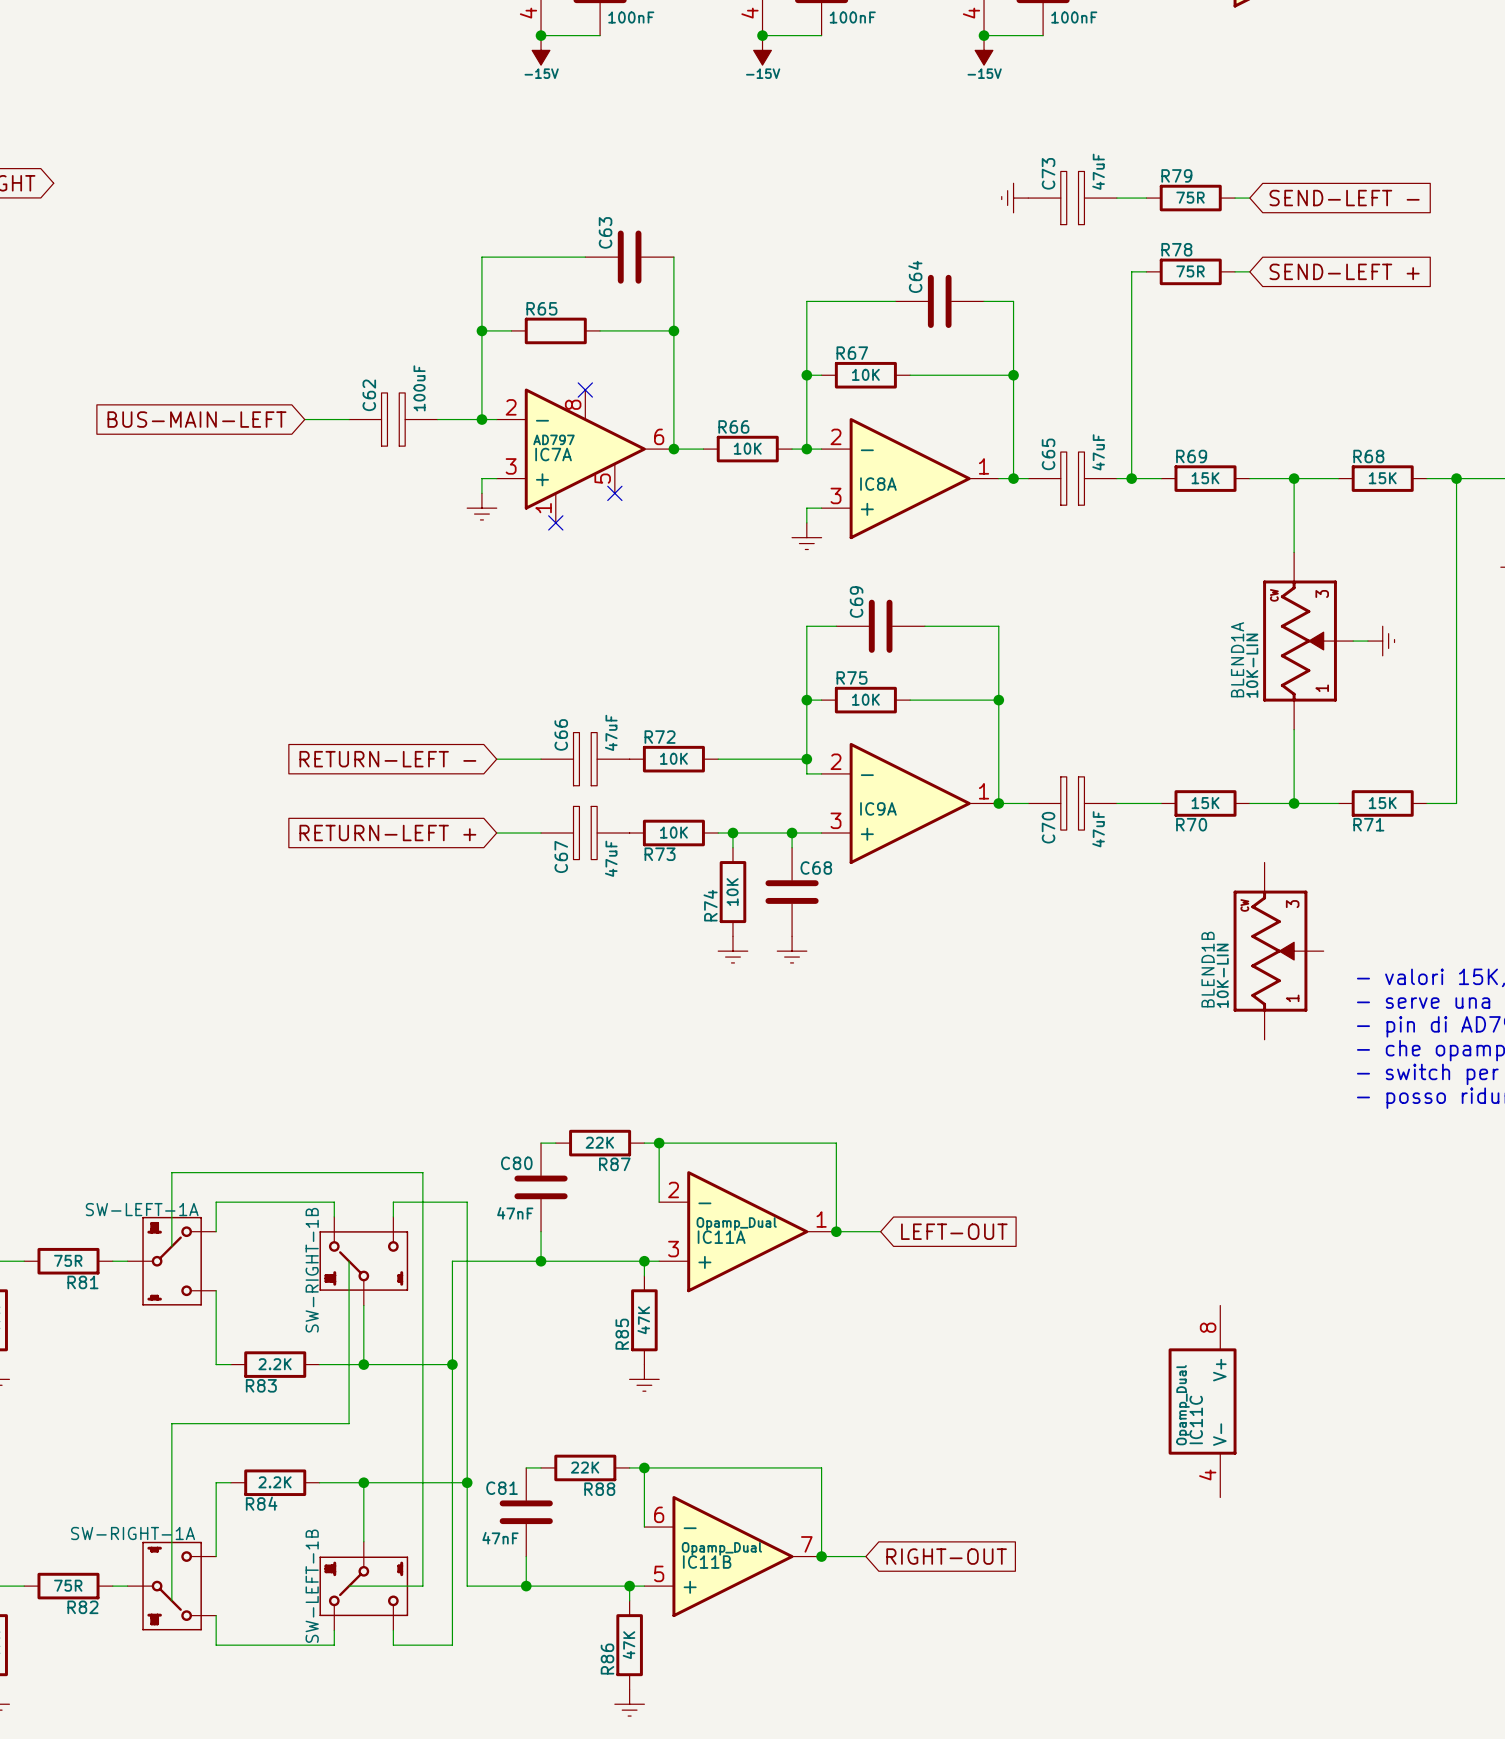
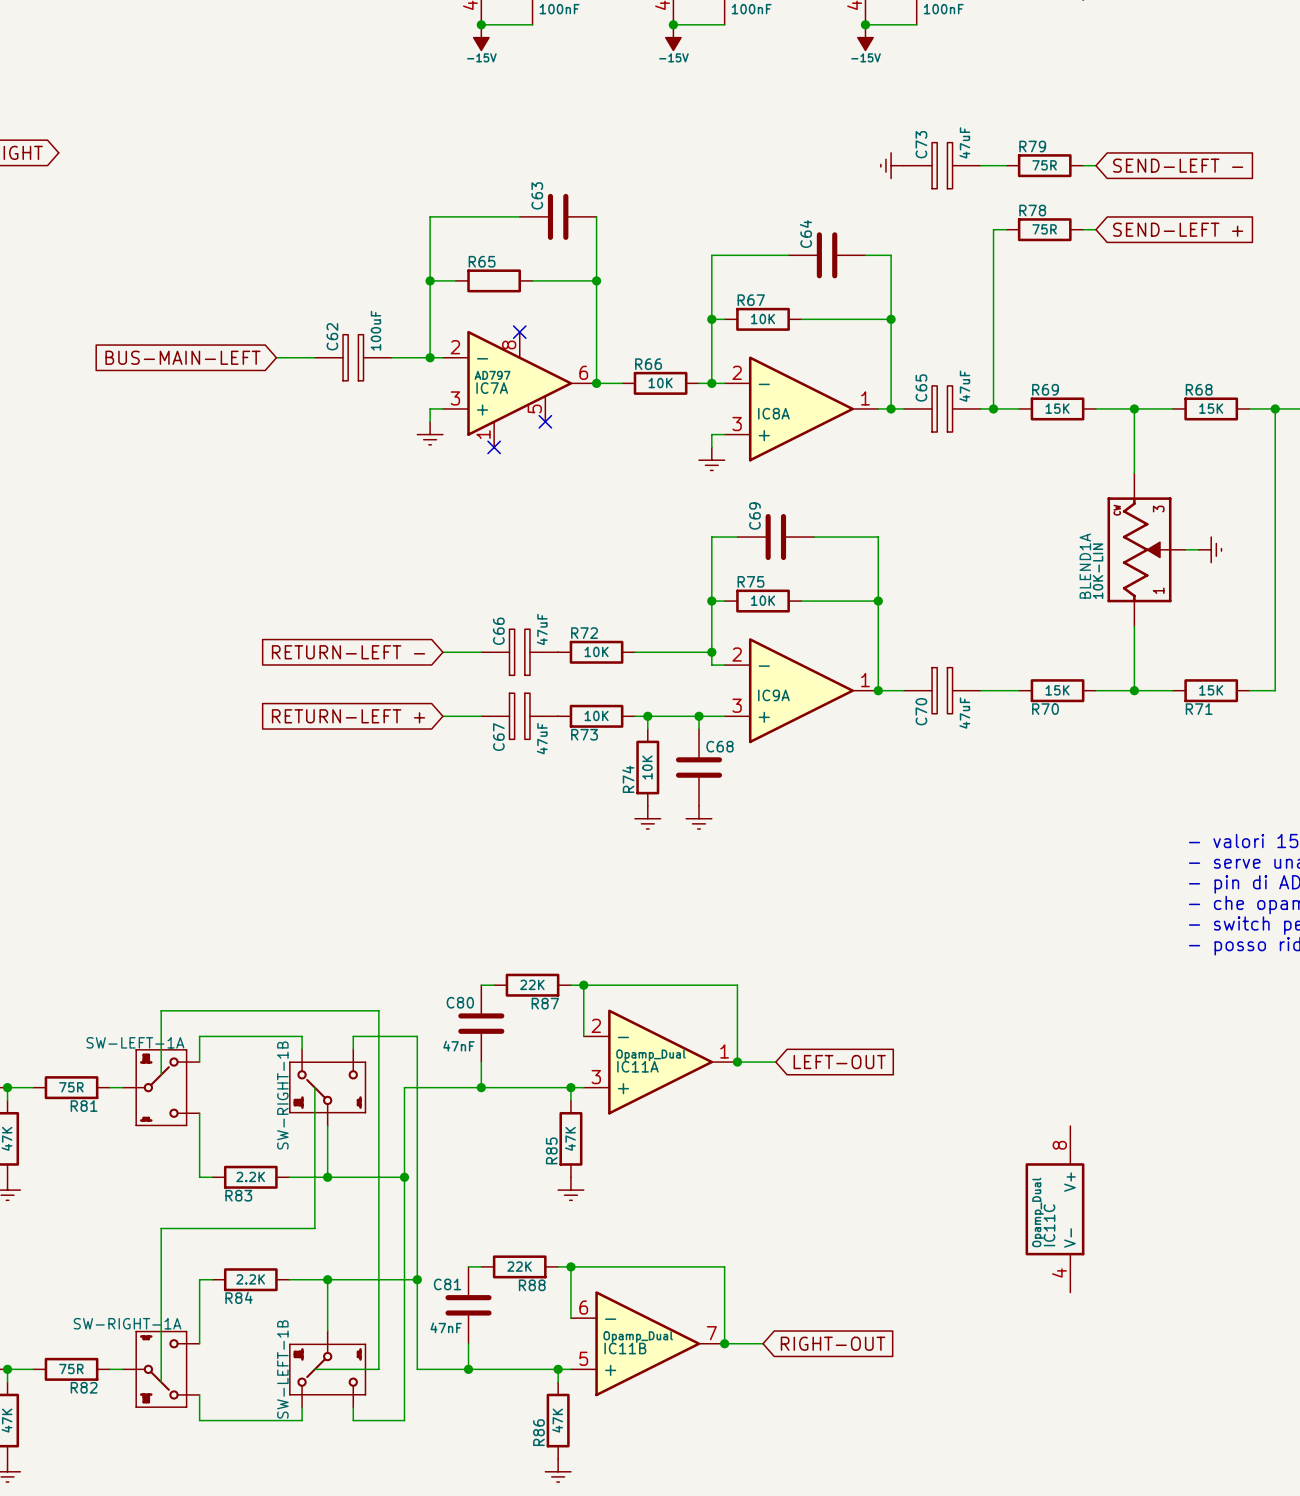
BLEND1B: 10K-LIN (1278, 951) -> none

